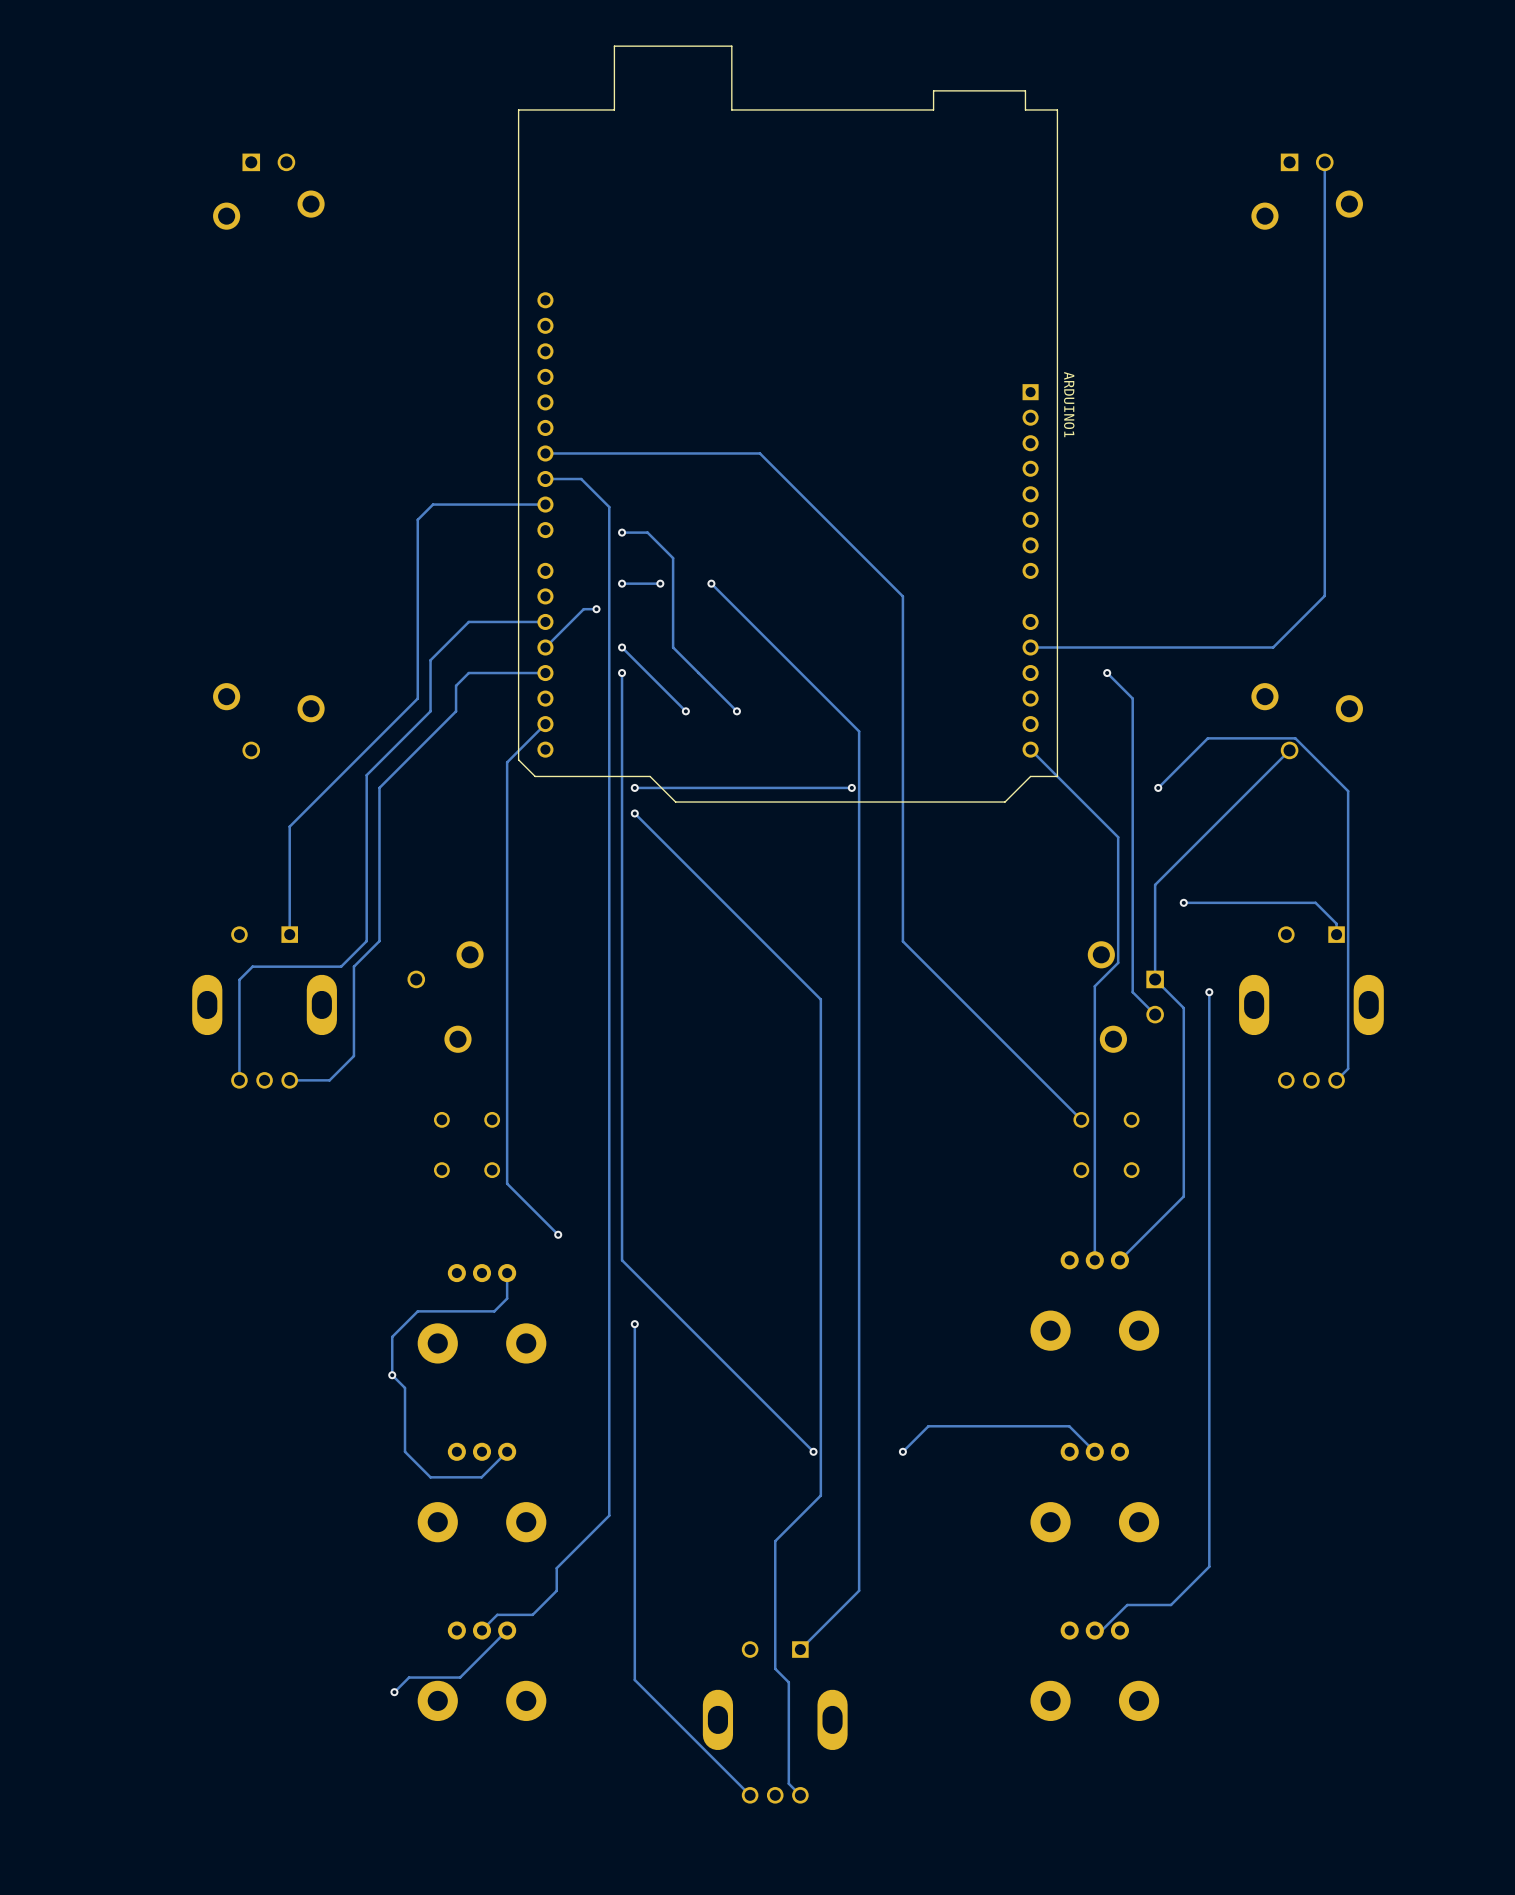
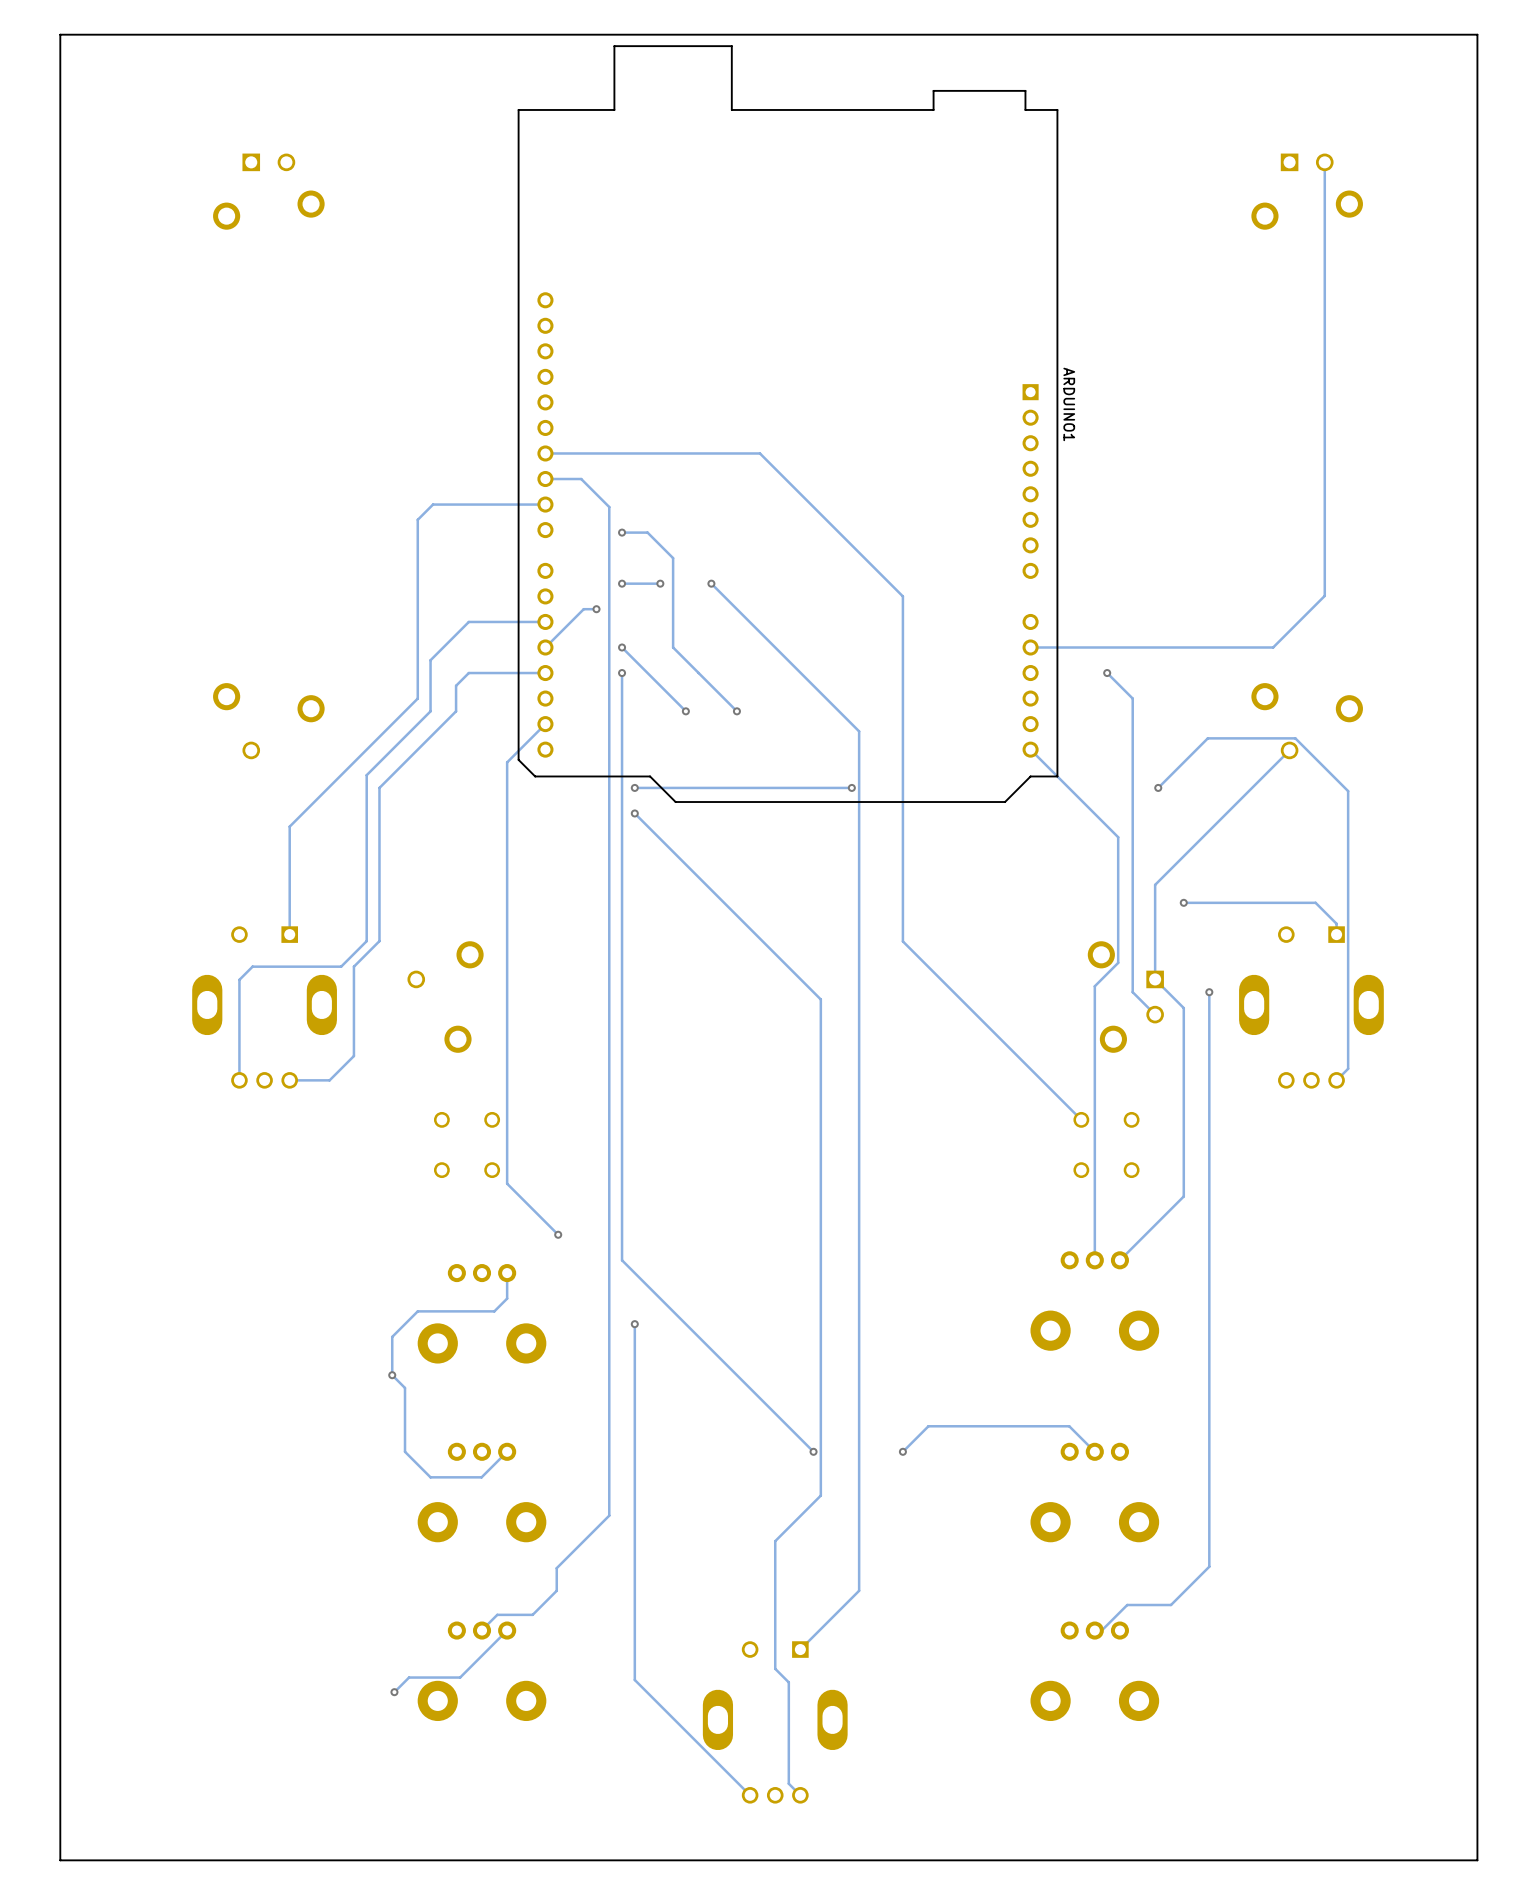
board edge: none -> (1477, 34) (60, 34) (60, 1860) (1477, 1860) (1477, 34)

